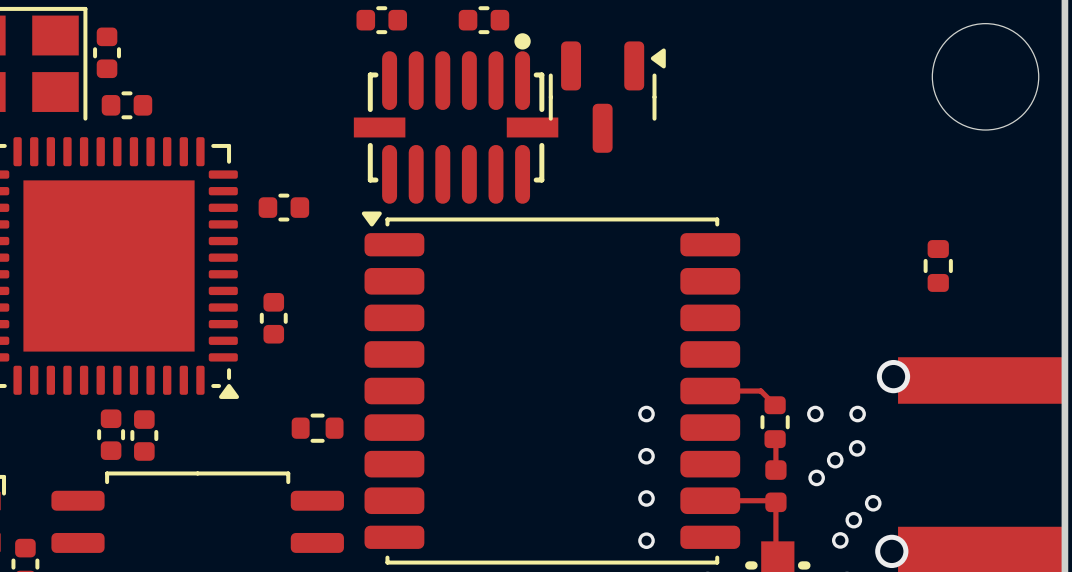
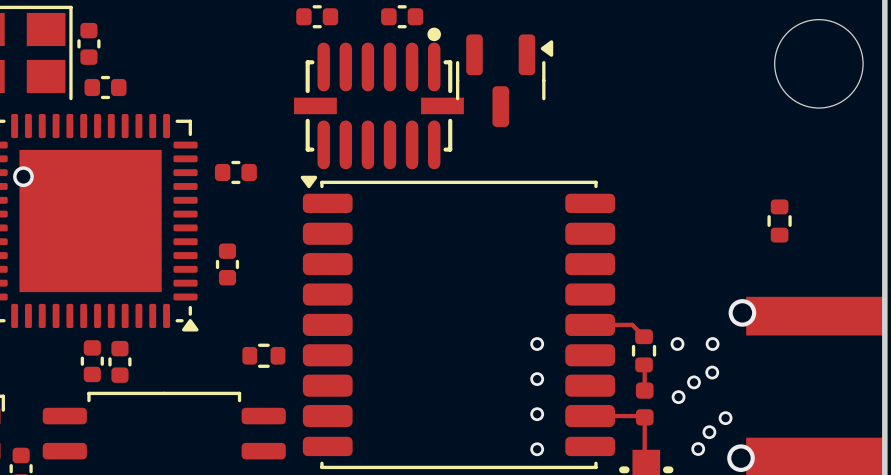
via: none -> (23, 176)

